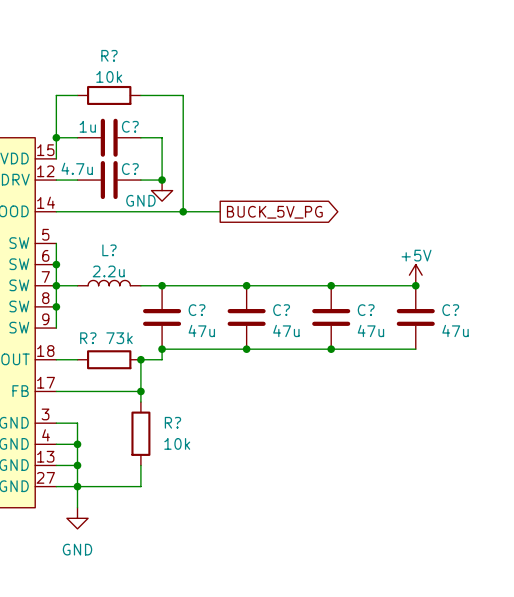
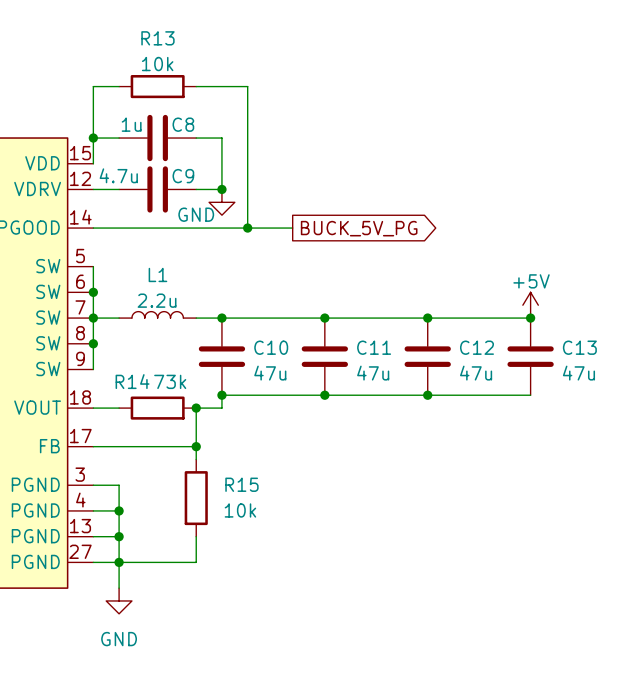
R? name: R? (109, 55) -> R13 (157, 38)
C? name: C? (130, 126) -> C8 (183, 124)
C? name: C? (130, 169) -> C9 (183, 176)
L? name: L? (109, 250) -> L1 (157, 274)
C? name: C? (197, 310) -> C10 (271, 347)
C? name: C? (281, 310) -> C11 (374, 347)
C? name: C? (366, 310) -> C12 (476, 347)
C? name: C? (450, 310) -> C13 (579, 347)
R? name: R? (88, 338) -> R14 (132, 381)
R? name: R? (172, 422) -> R15 (241, 484)

